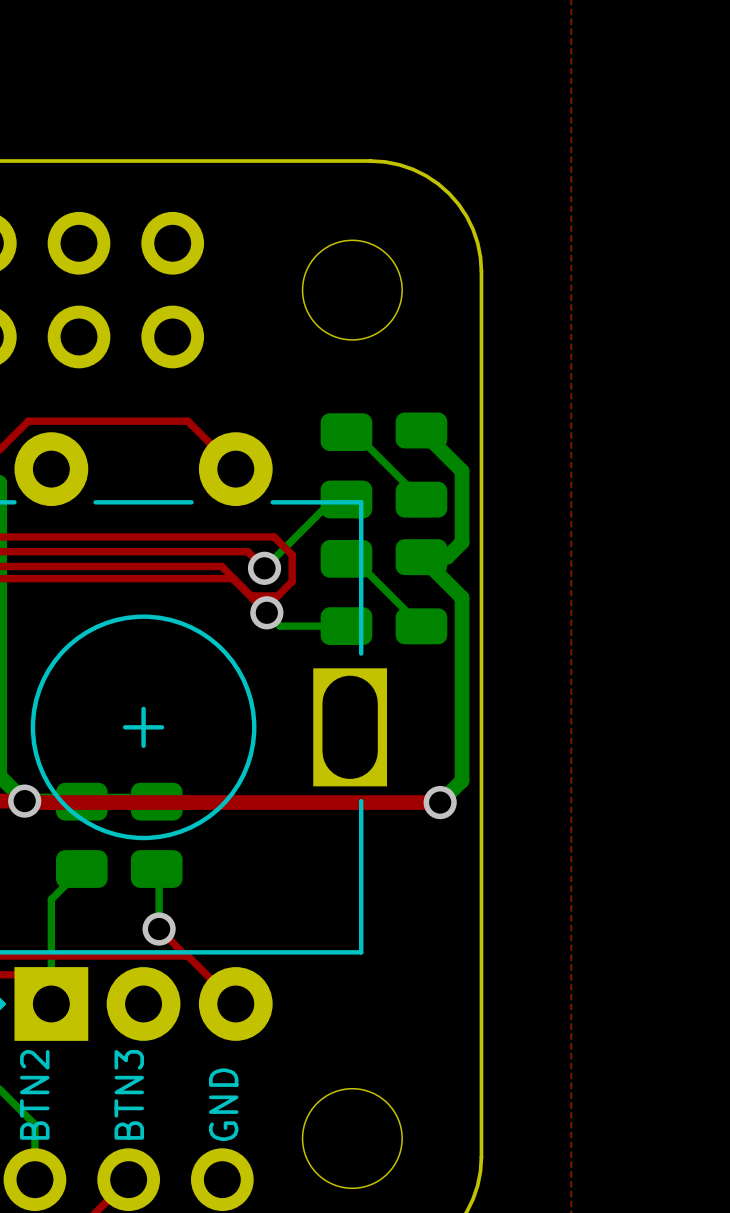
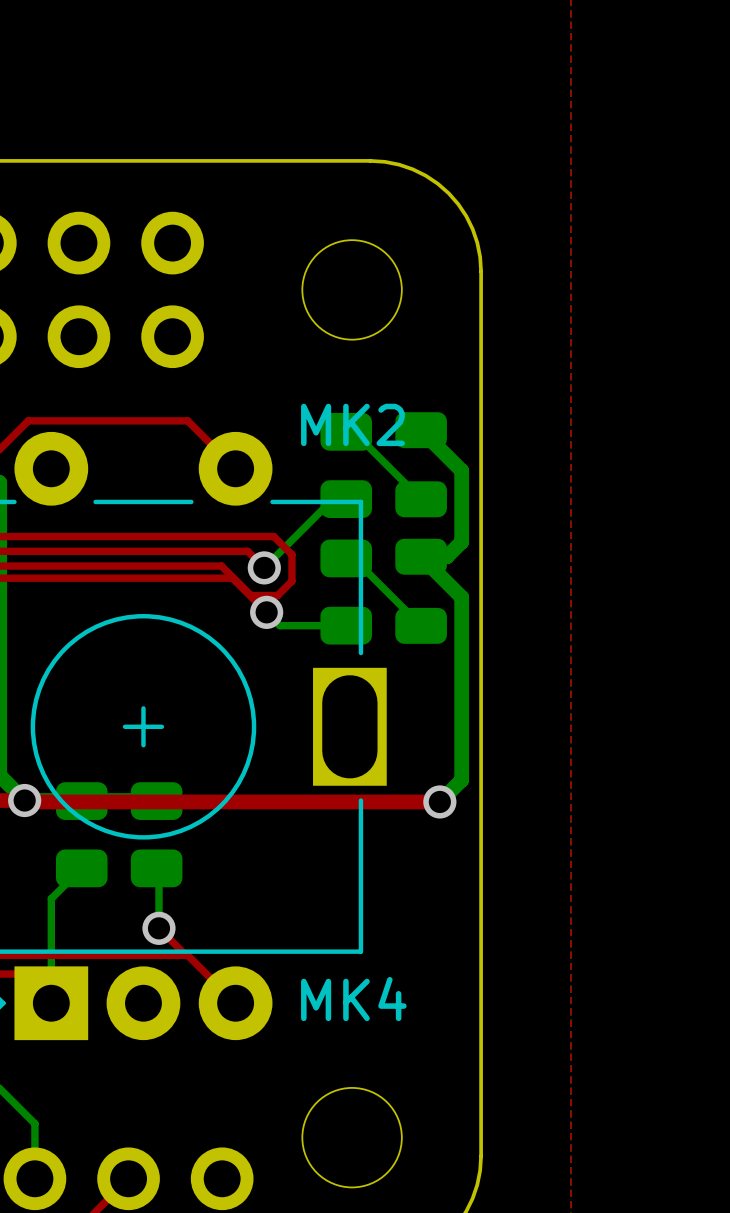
MK2 name: none -> MK2 (352, 424)
MK4 name: none -> MK4 (353, 999)
text: BTN2 (34, 1094) -> none
text: BTN3 (129, 1094) -> none
text: GND (223, 1104) -> none

